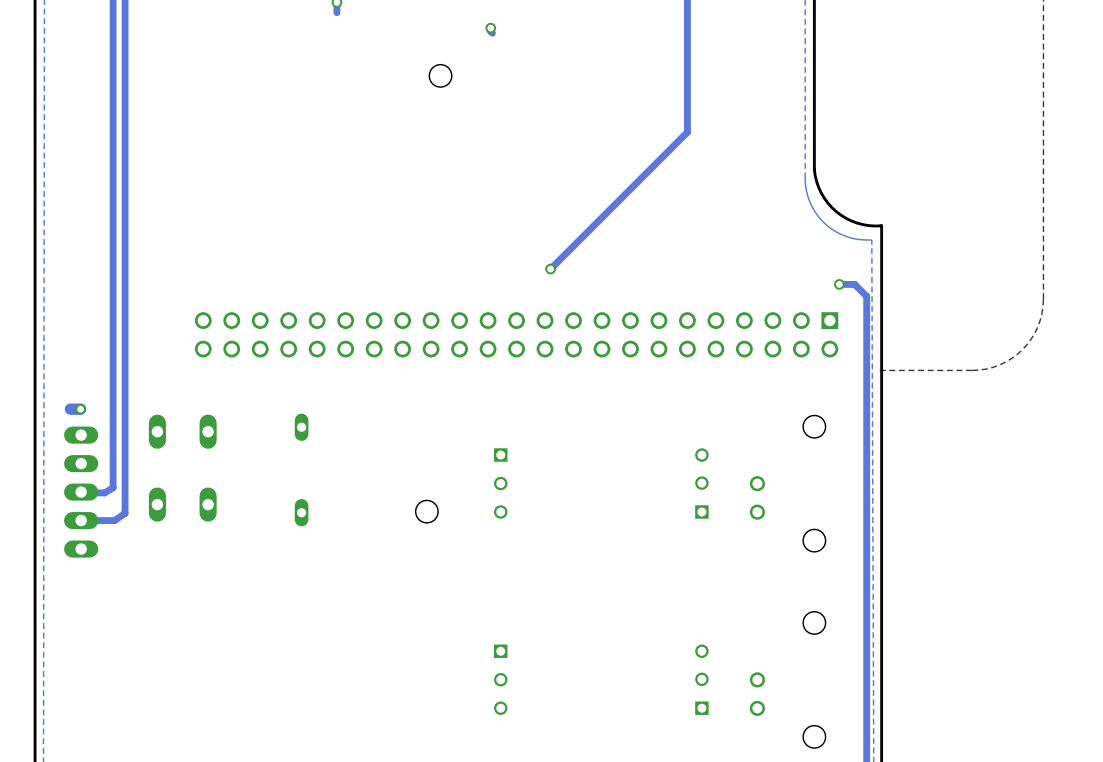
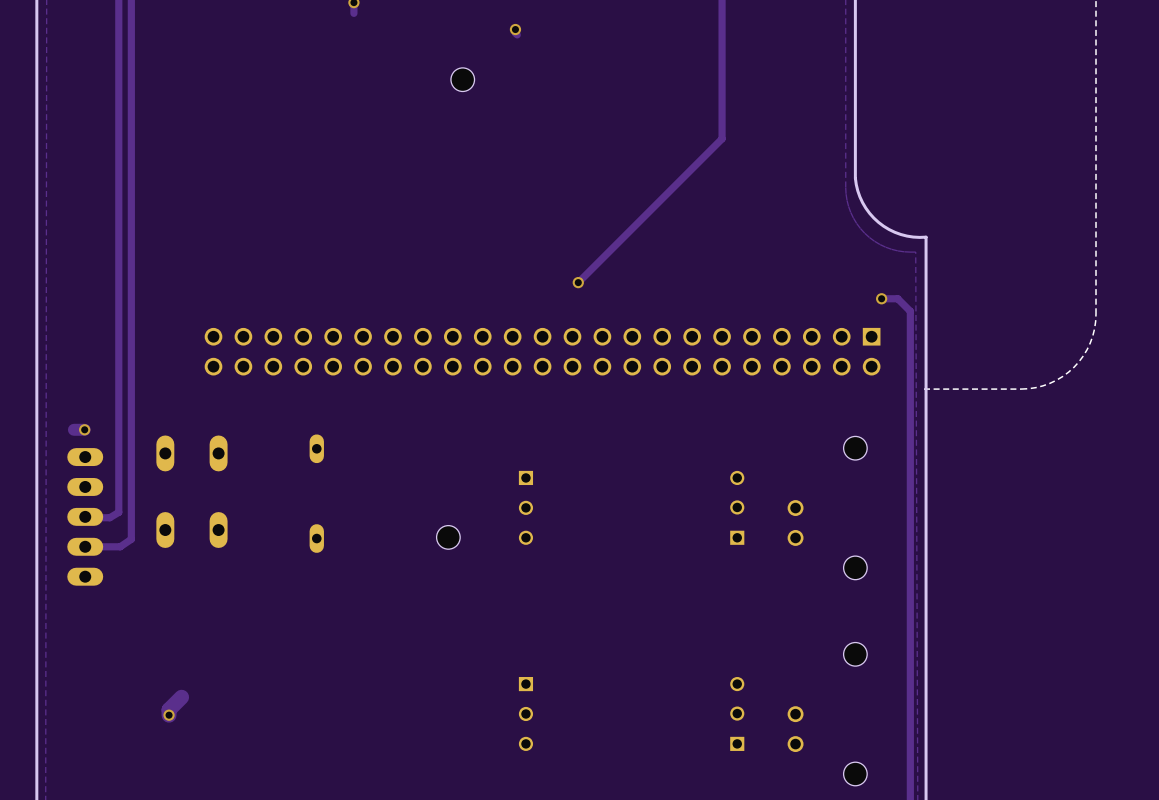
track: none -> (181, 697) (169, 709) (169, 715)
via: none -> (169, 715)

